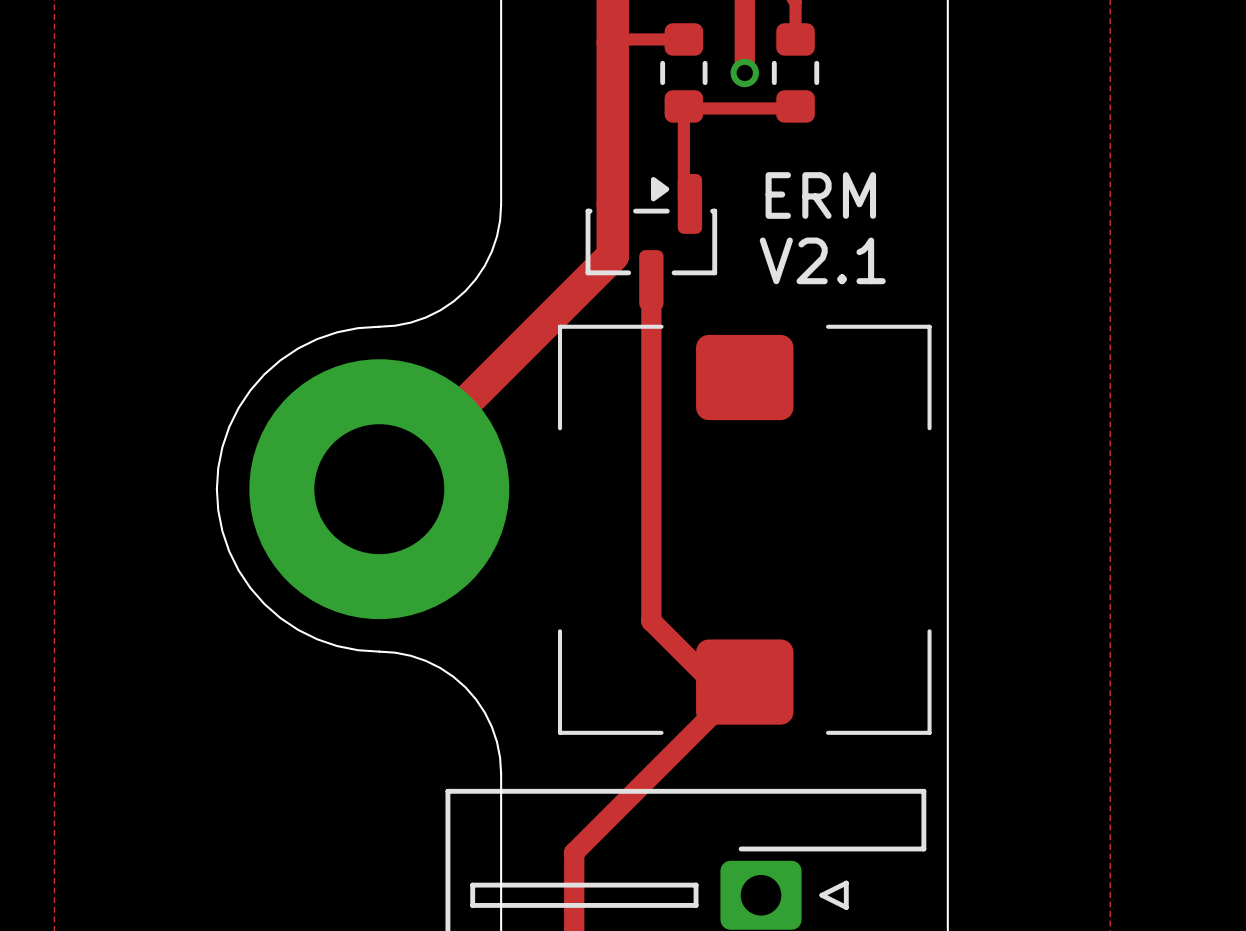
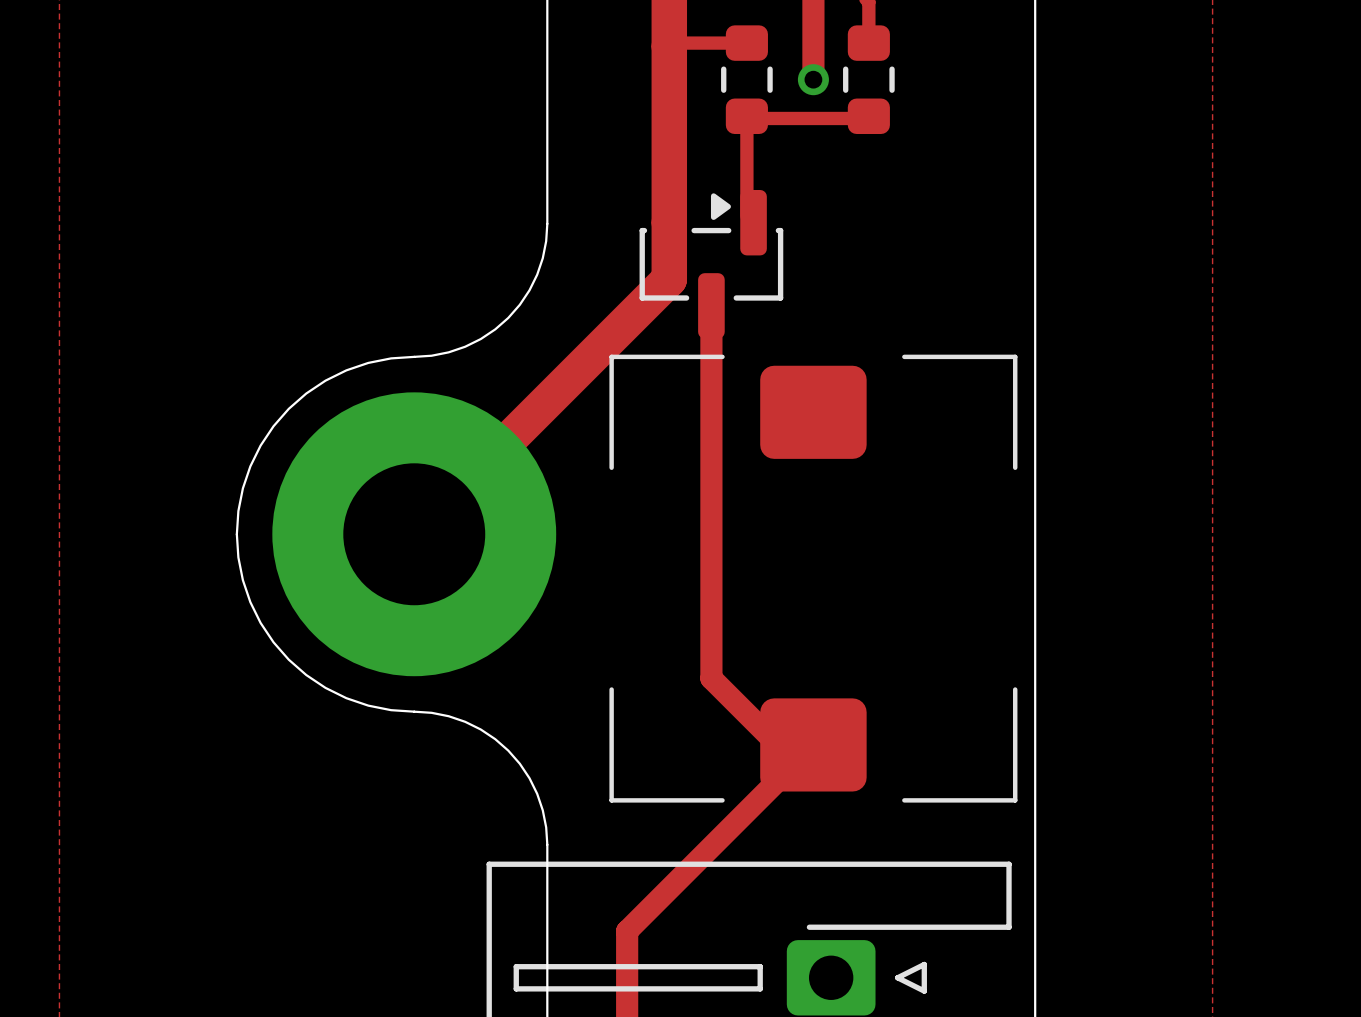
text: ERM (820, 195) -> none
text: V2.1 (822, 260) -> none

